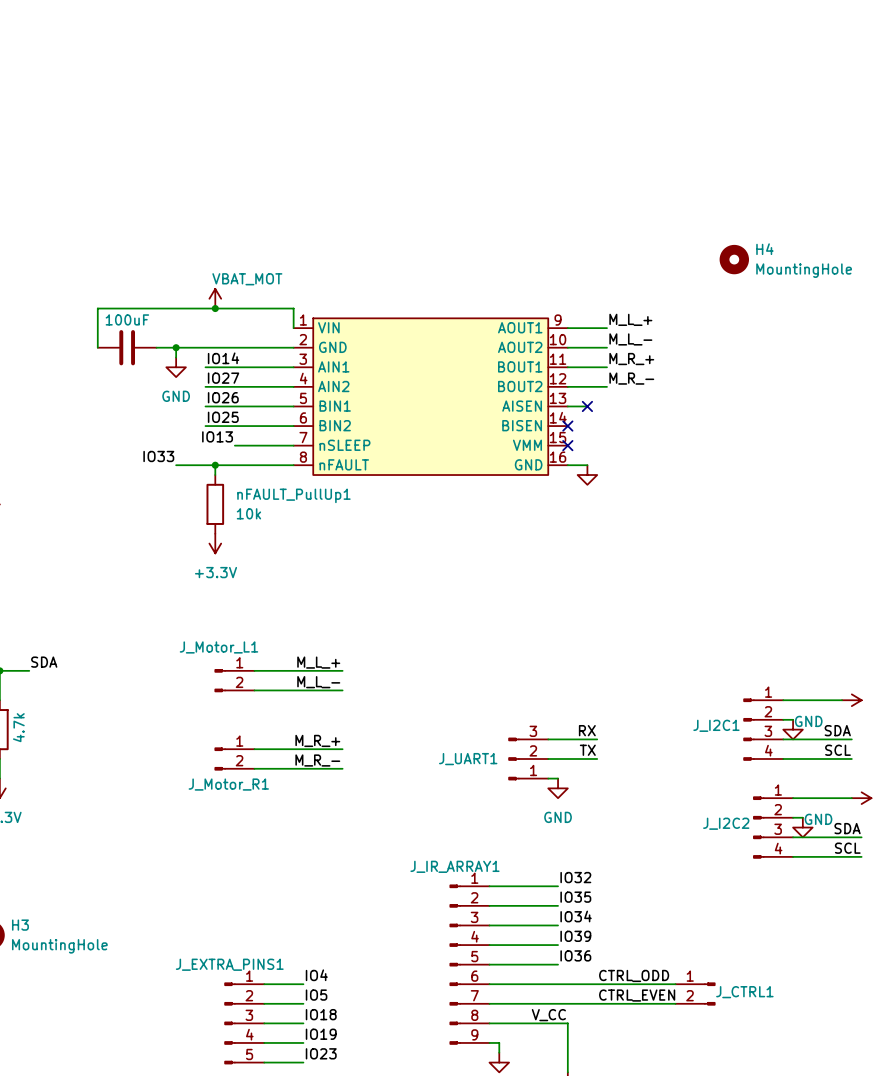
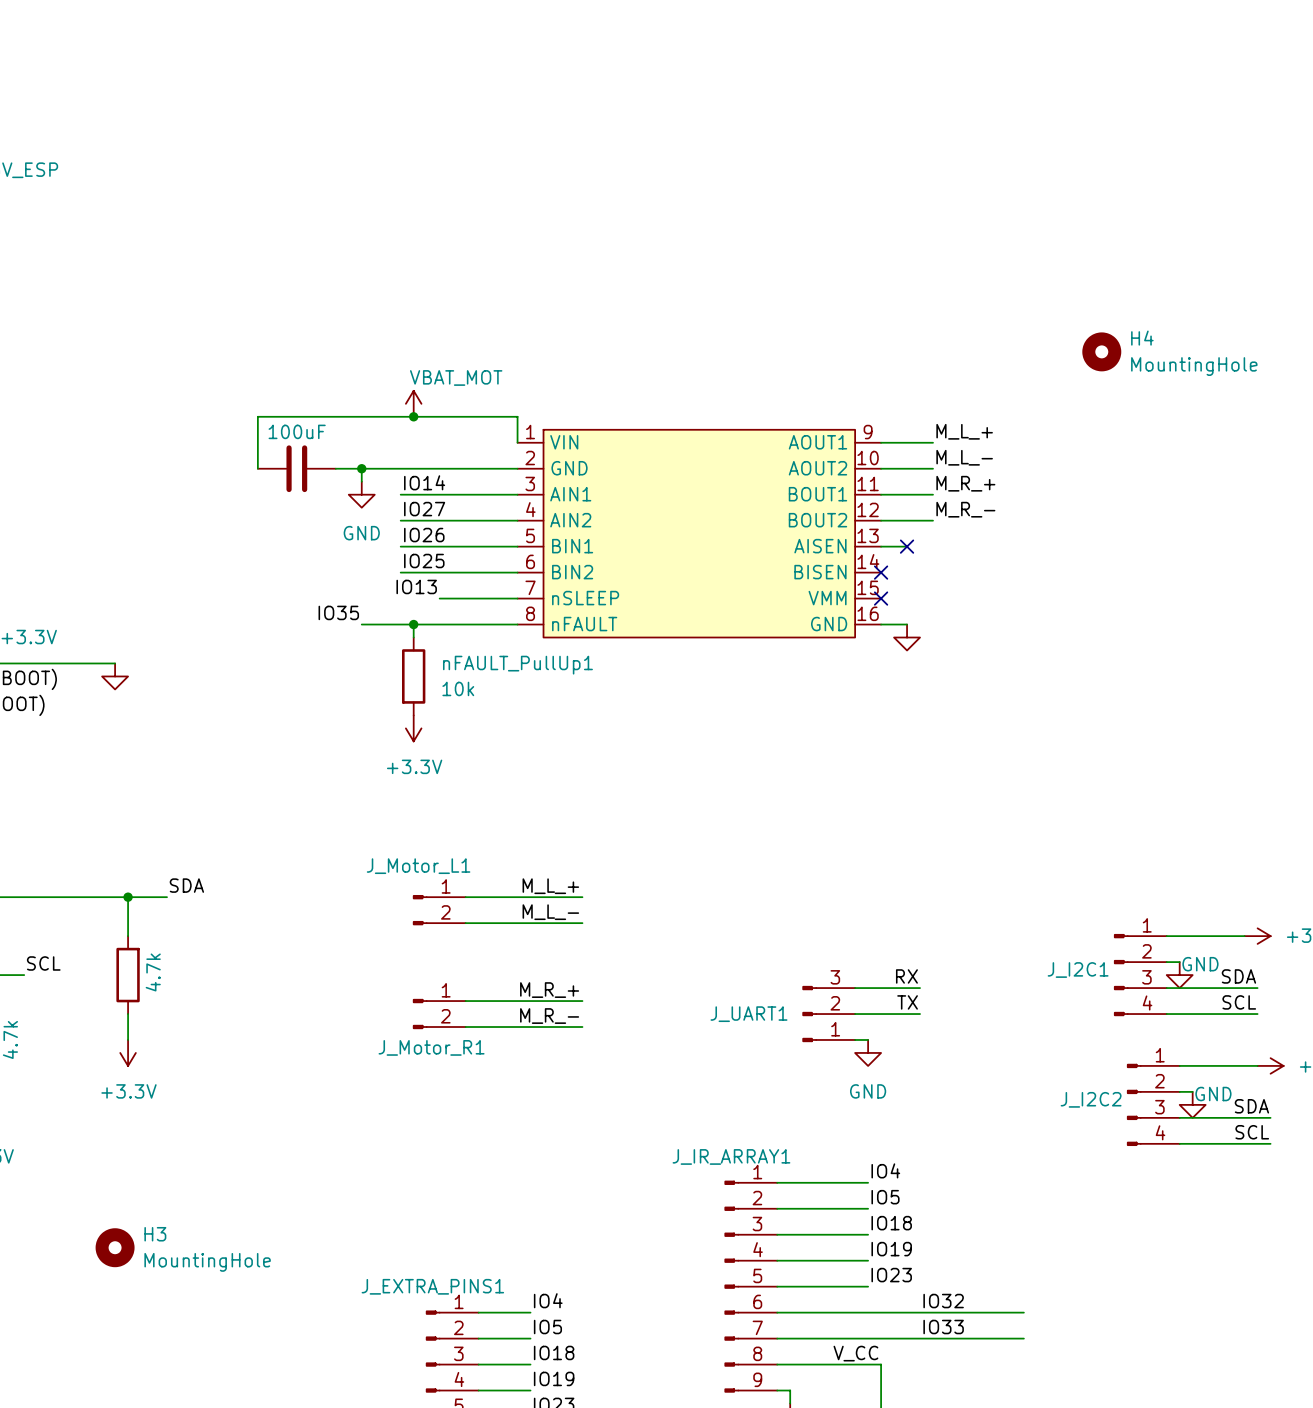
label: IO33 (158, 456) -> IO35 (338, 612)
label: IO32 (575, 877) -> IO4 (885, 1170)
label: IO35 (575, 897) -> IO5 (885, 1197)
label: IO34 (576, 916) -> IO18 (891, 1223)
label: IO39 (575, 936) -> IO19 (891, 1249)
label: IO36 (575, 955) -> IO23 (891, 1275)
label: CTRL_ODD (634, 975) -> IO32 (943, 1301)
J_CTRL1: (695, 994) -> none
label: CTRL_EVEN (637, 995) -> IO33 (943, 1327)

